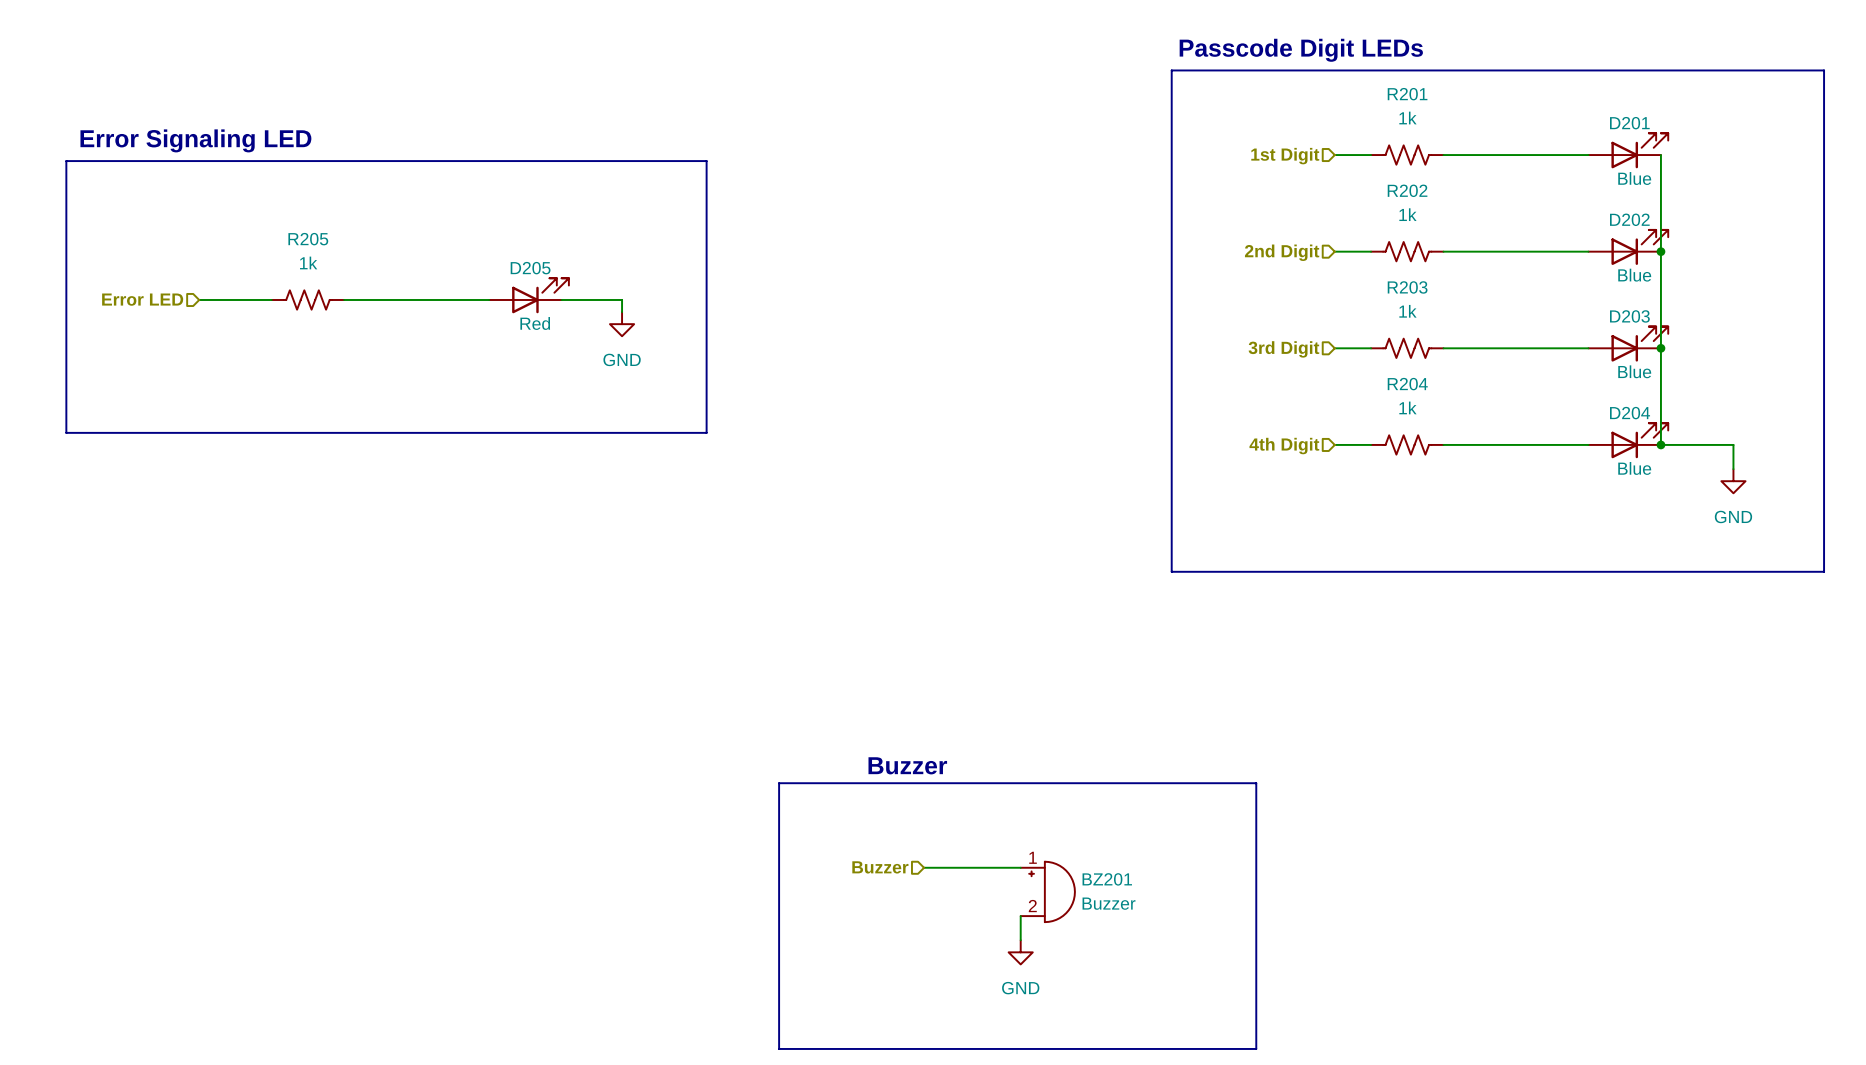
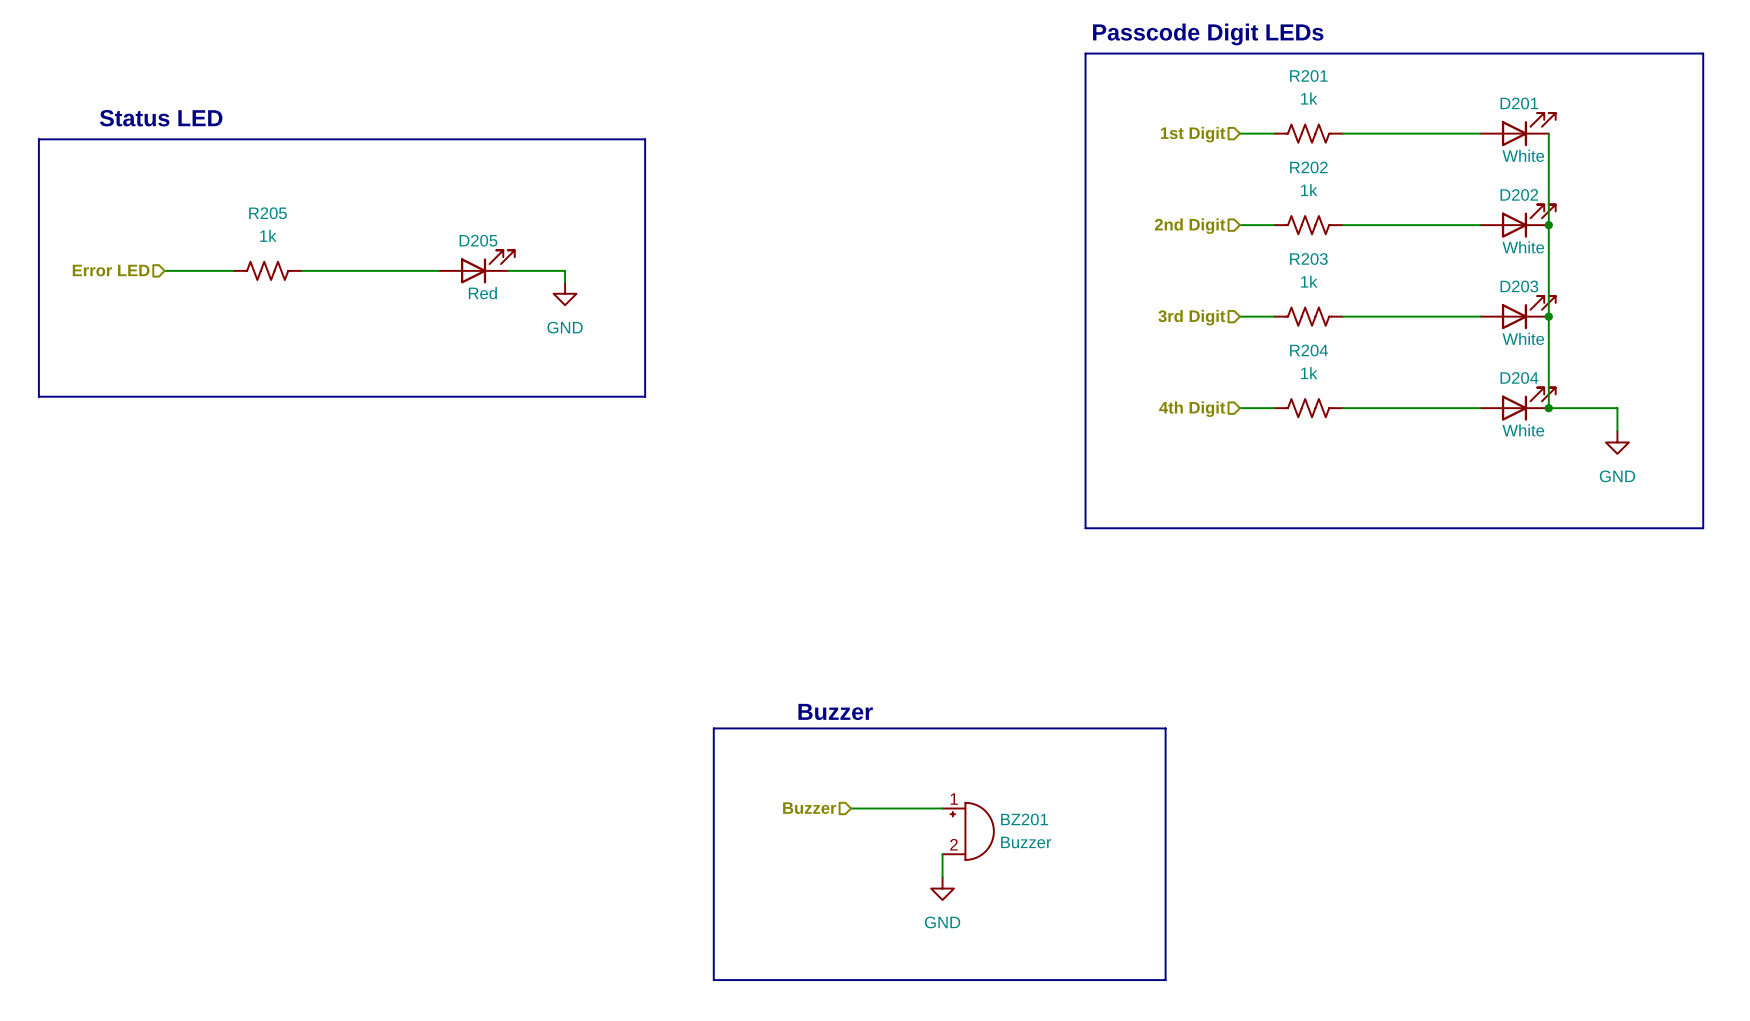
text: Error Signaling LED (195, 140) -> Status LED (161, 118)
D201 value: Blue (1634, 178) -> White (1523, 155)
D202 value: Blue (1634, 275) -> White (1523, 247)
D203 value: Blue (1634, 371) -> White (1523, 338)
D204 value: Blue (1634, 468) -> White (1523, 430)

